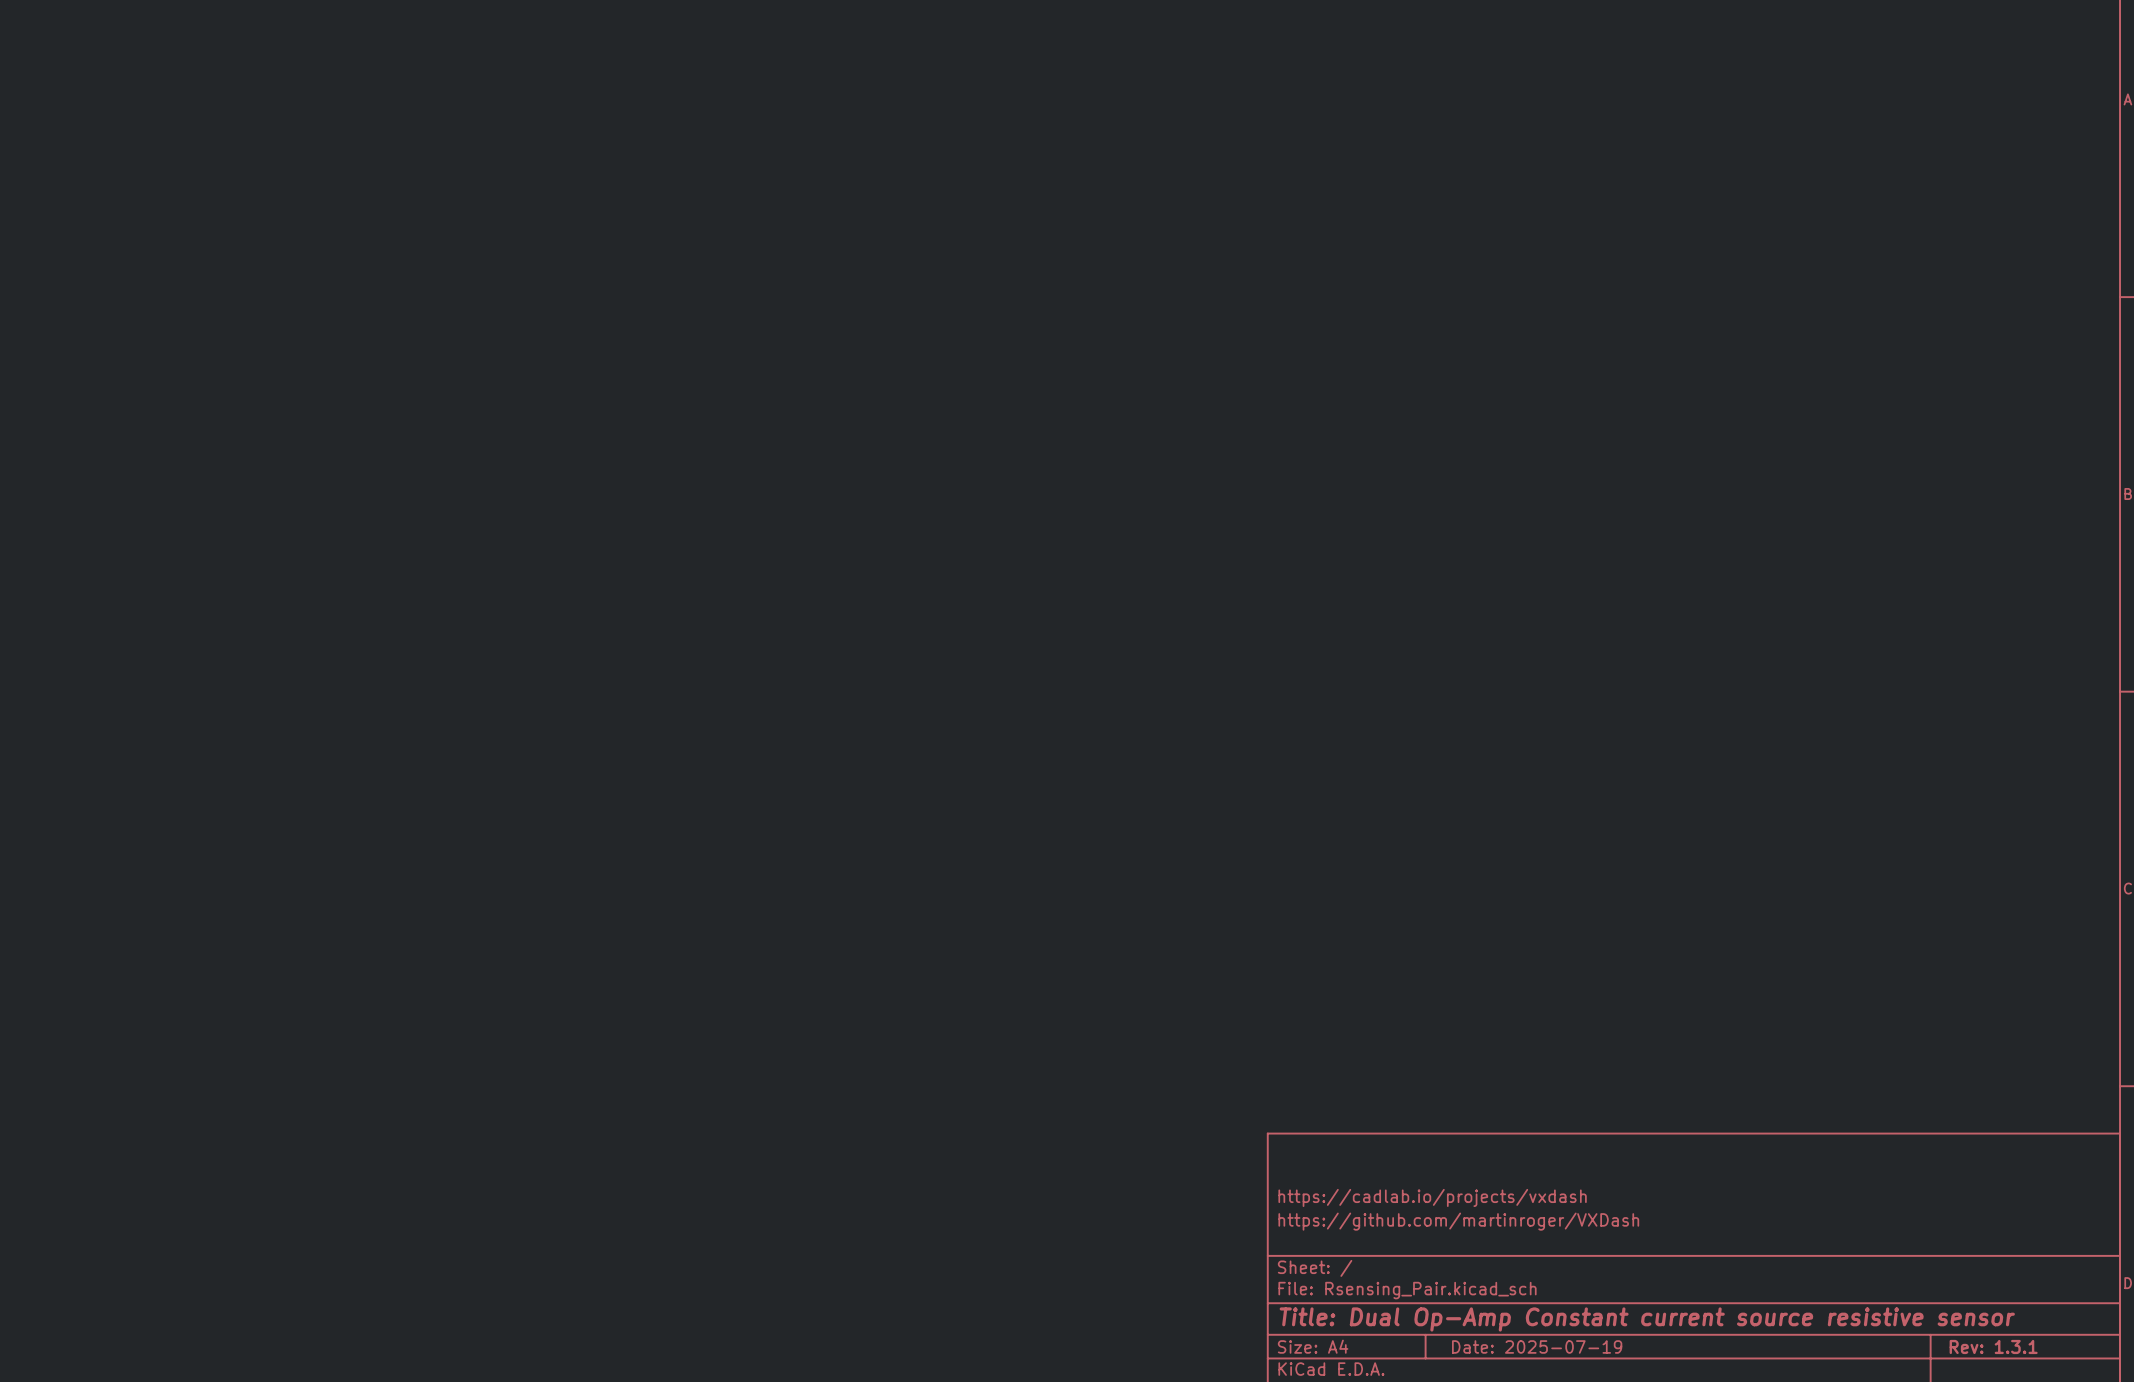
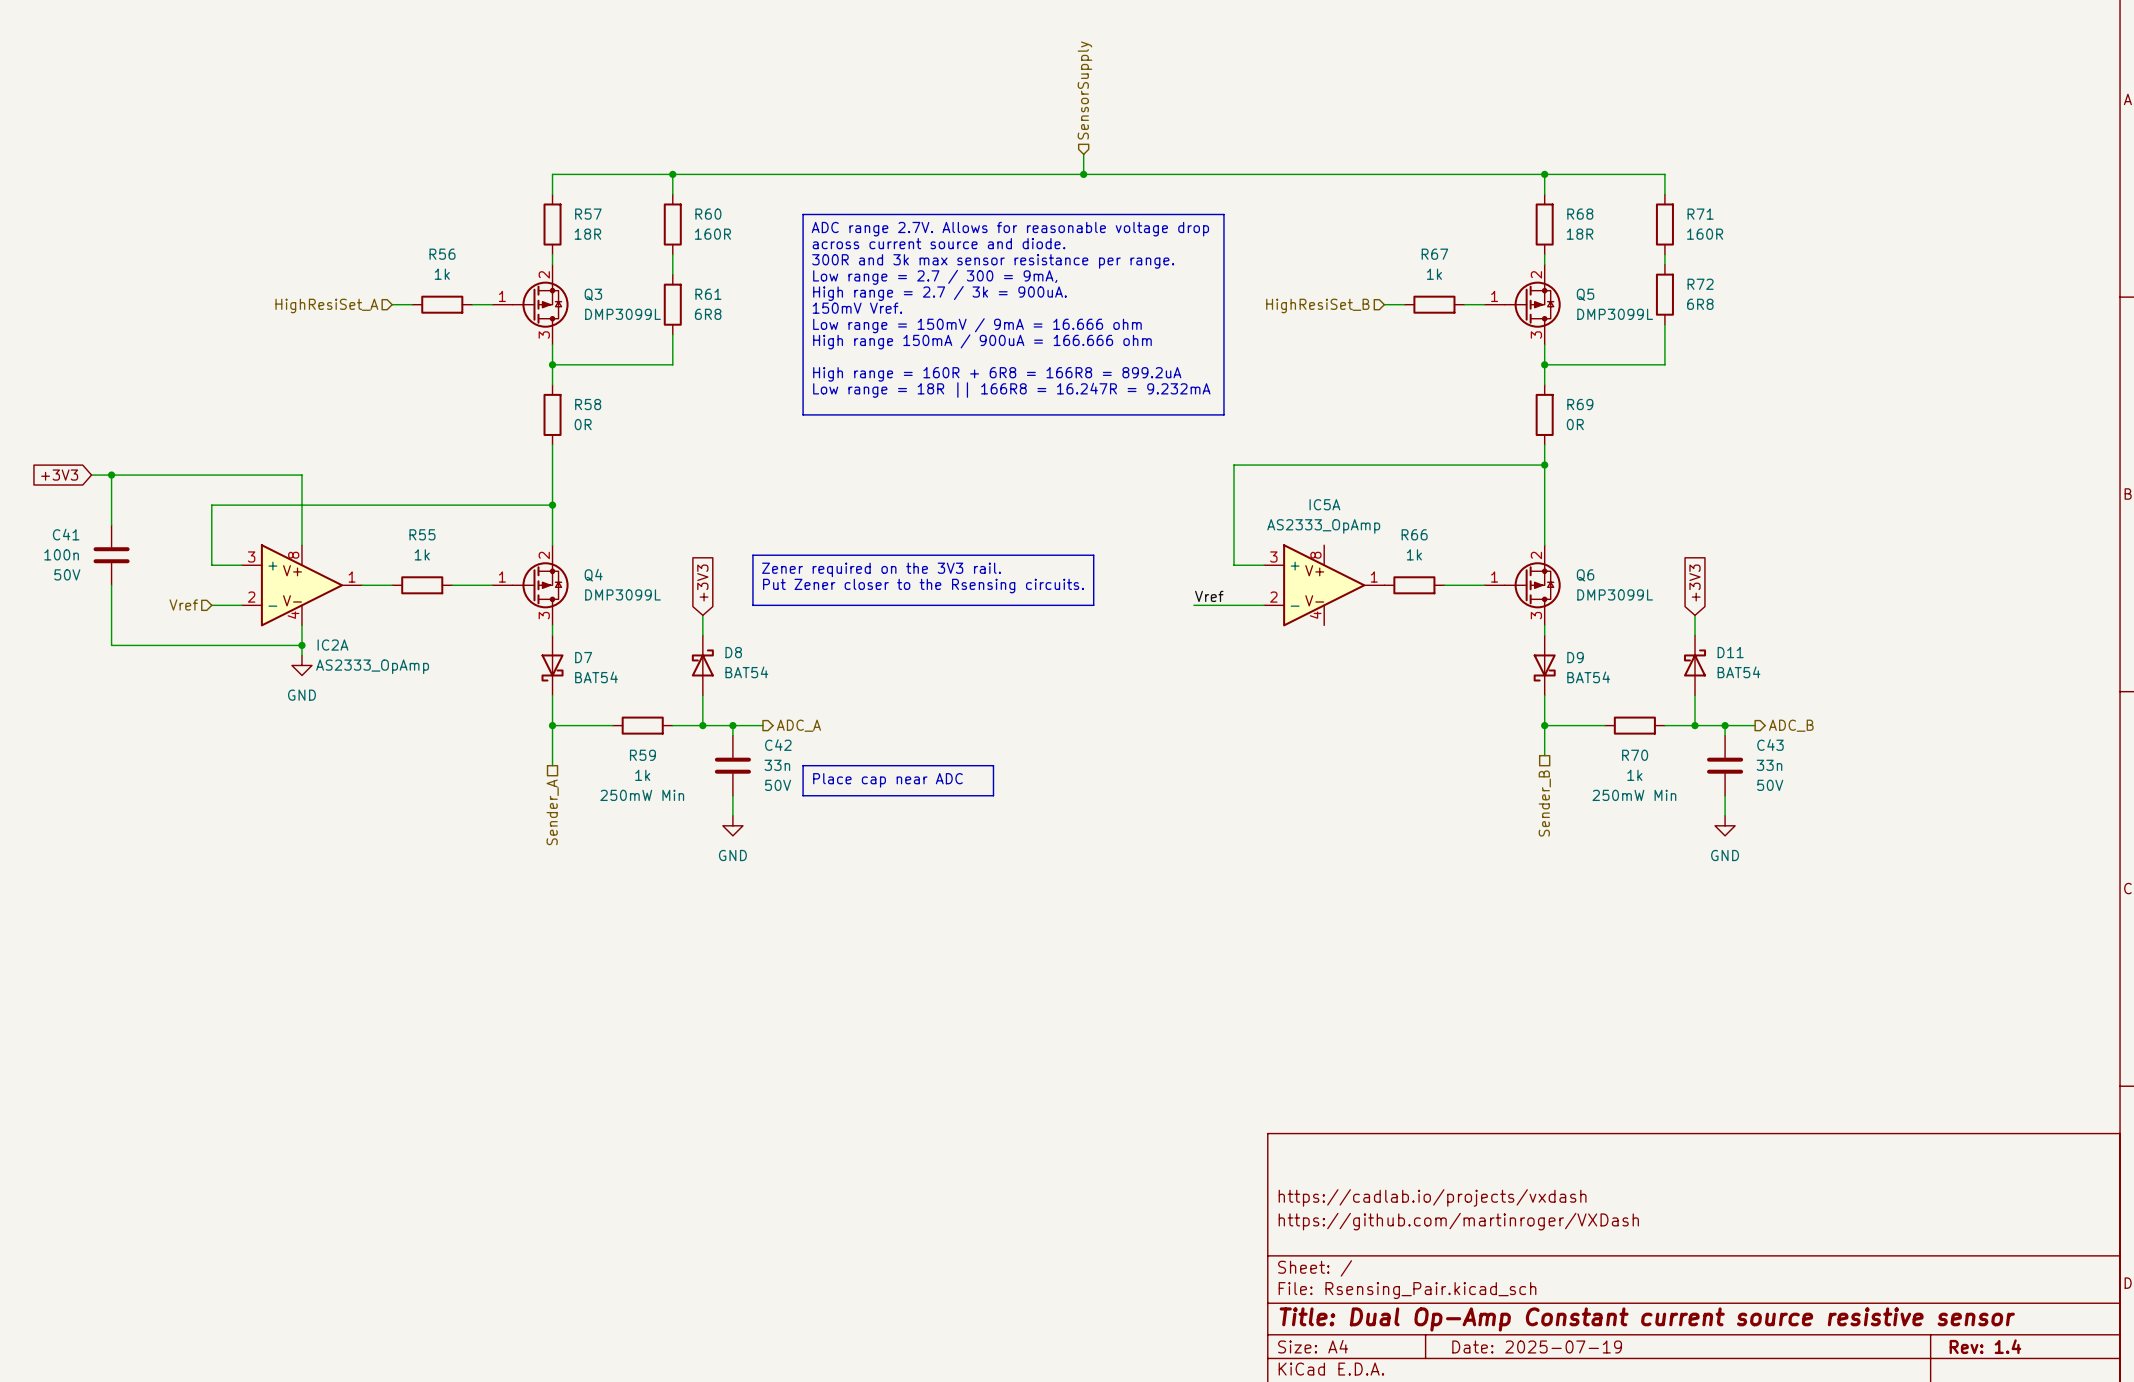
hierarchical label: none -> SensorSupply (1084, 90)
wire: none -> (1083, 154) (1083, 174)
wire: none -> (672, 174) (672, 194)
junction: none -> (672, 174)
junction: none -> (1083, 174)
wire: none -> (1544, 174) (1544, 194)
junction: none -> (1544, 174)
wire: none -> (552, 194) (552, 174) (1664, 174) (1664, 194)
line: none -> (803, 214) (803, 414) (1223, 414) (1223, 214) (803, 214)
R57: none -> 18R (552, 224)
R60: none -> 160R (672, 224)
R68: none -> 18R (1544, 224)
R71: none -> 160R (1664, 224)
text: none -> ADC range 2.7V. Allows for reasonable voltage drop (1010, 229)
text: none -> across current source and diode. (939, 243)
wire: none -> (552, 254) (552, 264)
wire: none -> (672, 254) (672, 274)
wire: none -> (1544, 254) (1544, 264)
wire: none -> (1664, 254) (1664, 264)
text: none -> 300R and 3k max sensor resistance per range. (993, 261)
text: none -> Low range = 2.7 / 300 = 9mA, (935, 277)
text: none -> High range = 2.7 / 3k = 900uA. (939, 293)
R72: none -> 6R8 (1664, 294)
wire: none -> (392, 304) (412, 304)
R56: none -> 1k (442, 304)
wire: none -> (472, 304) (492, 304)
Q3: none -> DMP3099L (530, 304)
R61: none -> 6R8 (672, 304)
wire: none -> (1384, 304) (1404, 304)
R67: none -> 1k (1434, 304)
wire: none -> (1464, 304) (1484, 304)
Q5: none -> DMP3099L (1522, 304)
hierarchical label: none -> HighResiSet_A (326, 305)
hierarchical label: none -> HighResiSet_B (1317, 305)
text: none -> 150mV Vref. (857, 308)
wire: none -> (1664, 324) (1664, 364) (1544, 364)
text: none -> Low range = 150mV / 9mA = 16.666 ohm (977, 325)
wire: none -> (672, 334) (672, 364) (552, 364)
text: none -> High range 150mA / 900uA = 166.666 ohm (982, 341)
wire: none -> (552, 344) (552, 384)
wire: none -> (1544, 344) (1544, 384)
junction: none -> (552, 364)
junction: none -> (1544, 364)
text: none -> High range = 160R + 6R8 = 166R8 = 899.2uA (997, 374)
text: none -> Low range = 18R || 166R8 = 16.247R = 9.232mA (1011, 390)
R58: none -> 0R (552, 414)
R69: none -> 0R (1544, 414)
wire: none -> (552, 444) (552, 545)
wire: none -> (1544, 444) (1544, 545)
wire: none -> (1544, 465) (1234, 465) (1234, 565) (1264, 565)
junction: none -> (1544, 465)
global label: none -> +3V3 (59, 475)
wire: none -> (91, 475) (301, 475) (301, 545)
wire: none -> (111, 475) (111, 525)
junction: none -> (111, 475)
wire: none -> (552, 505) (211, 505) (211, 565) (241, 565)
junction: none -> (552, 505)
C41: none -> 100n (111, 555)
line: none -> (752, 555) (1093, 555) (1093, 605) (752, 605) (752, 555)
text: none -> Zener required on the 3V3 rail. (881, 569)
global label: none -> +3V3 (702, 583)
global label: none -> +3V3 (1695, 583)
wire: none -> (111, 585) (111, 645) (301, 645)
IC2A: none -> AS2333_OpAmp (301, 585)
wire: none -> (362, 585) (392, 585)
R55: none -> 1k (422, 585)
wire: none -> (452, 585) (492, 585)
Q4: none -> DMP3099L (530, 585)
IC5A: none -> AS2333_OpAmp (1324, 585)
R66: none -> 1k (1414, 585)
wire: none -> (1444, 585) (1484, 585)
Q6: none -> DMP3099L (1522, 585)
text: none -> Put Zener closer to the Rsensing circuits. (923, 586)
label: none -> Vref (1209, 596)
hierarchical label: none -> Vref (183, 604)
wire: none -> (211, 605) (241, 605)
wire: none -> (1193, 605) (1264, 605)
wire: none -> (702, 615) (702, 635)
wire: none -> (1695, 615) (1695, 635)
wire: none -> (301, 625) (301, 655)
wire: none -> (552, 625) (552, 635)
wire: none -> (1544, 625) (1544, 635)
junction: none -> (301, 645)
power symbol: none -> GND (301, 665)
D7: none -> BAT54 (552, 665)
D8: none -> BAT54 (702, 665)
D9: none -> BAT54 (1544, 665)
D11: none -> BAT54 (1695, 665)
wire: none -> (552, 695) (552, 765)
wire: none -> (702, 695) (702, 725)
wire: none -> (1544, 695) (1544, 755)
wire: none -> (1695, 695) (1695, 725)
wire: none -> (552, 725) (612, 725)
junction: none -> (552, 725)
R59: none -> 1k (642, 725)
wire: none -> (672, 725) (762, 725)
junction: none -> (702, 725)
wire: none -> (732, 725) (732, 735)
junction: none -> (732, 725)
hierarchical label: none -> ADC_A (798, 725)
wire: none -> (1544, 725) (1604, 725)
junction: none -> (1544, 725)
R70: none -> 1k (1634, 725)
wire: none -> (1664, 725) (1755, 725)
junction: none -> (1695, 725)
wire: none -> (1725, 725) (1725, 735)
junction: none -> (1725, 725)
hierarchical label: none -> ADC_B (1791, 725)
C42: none -> 33n (732, 765)
line: none -> (803, 765) (993, 765) (993, 795) (803, 795) (803, 765)
C43: none -> 33n (1725, 765)
text: none -> Place cap near ADC (887, 780)
wire: none -> (732, 795) (732, 815)
wire: none -> (1725, 795) (1725, 815)
hierarchical label: none -> Sender_B (1544, 803)
hierarchical label: none -> Sender_A (552, 812)
power symbol: none -> GND (732, 825)
power symbol: none -> GND (1725, 825)
title block: Rev: 1.3.1 (1993, 1346) -> Rev: 1.4 (1985, 1346)

